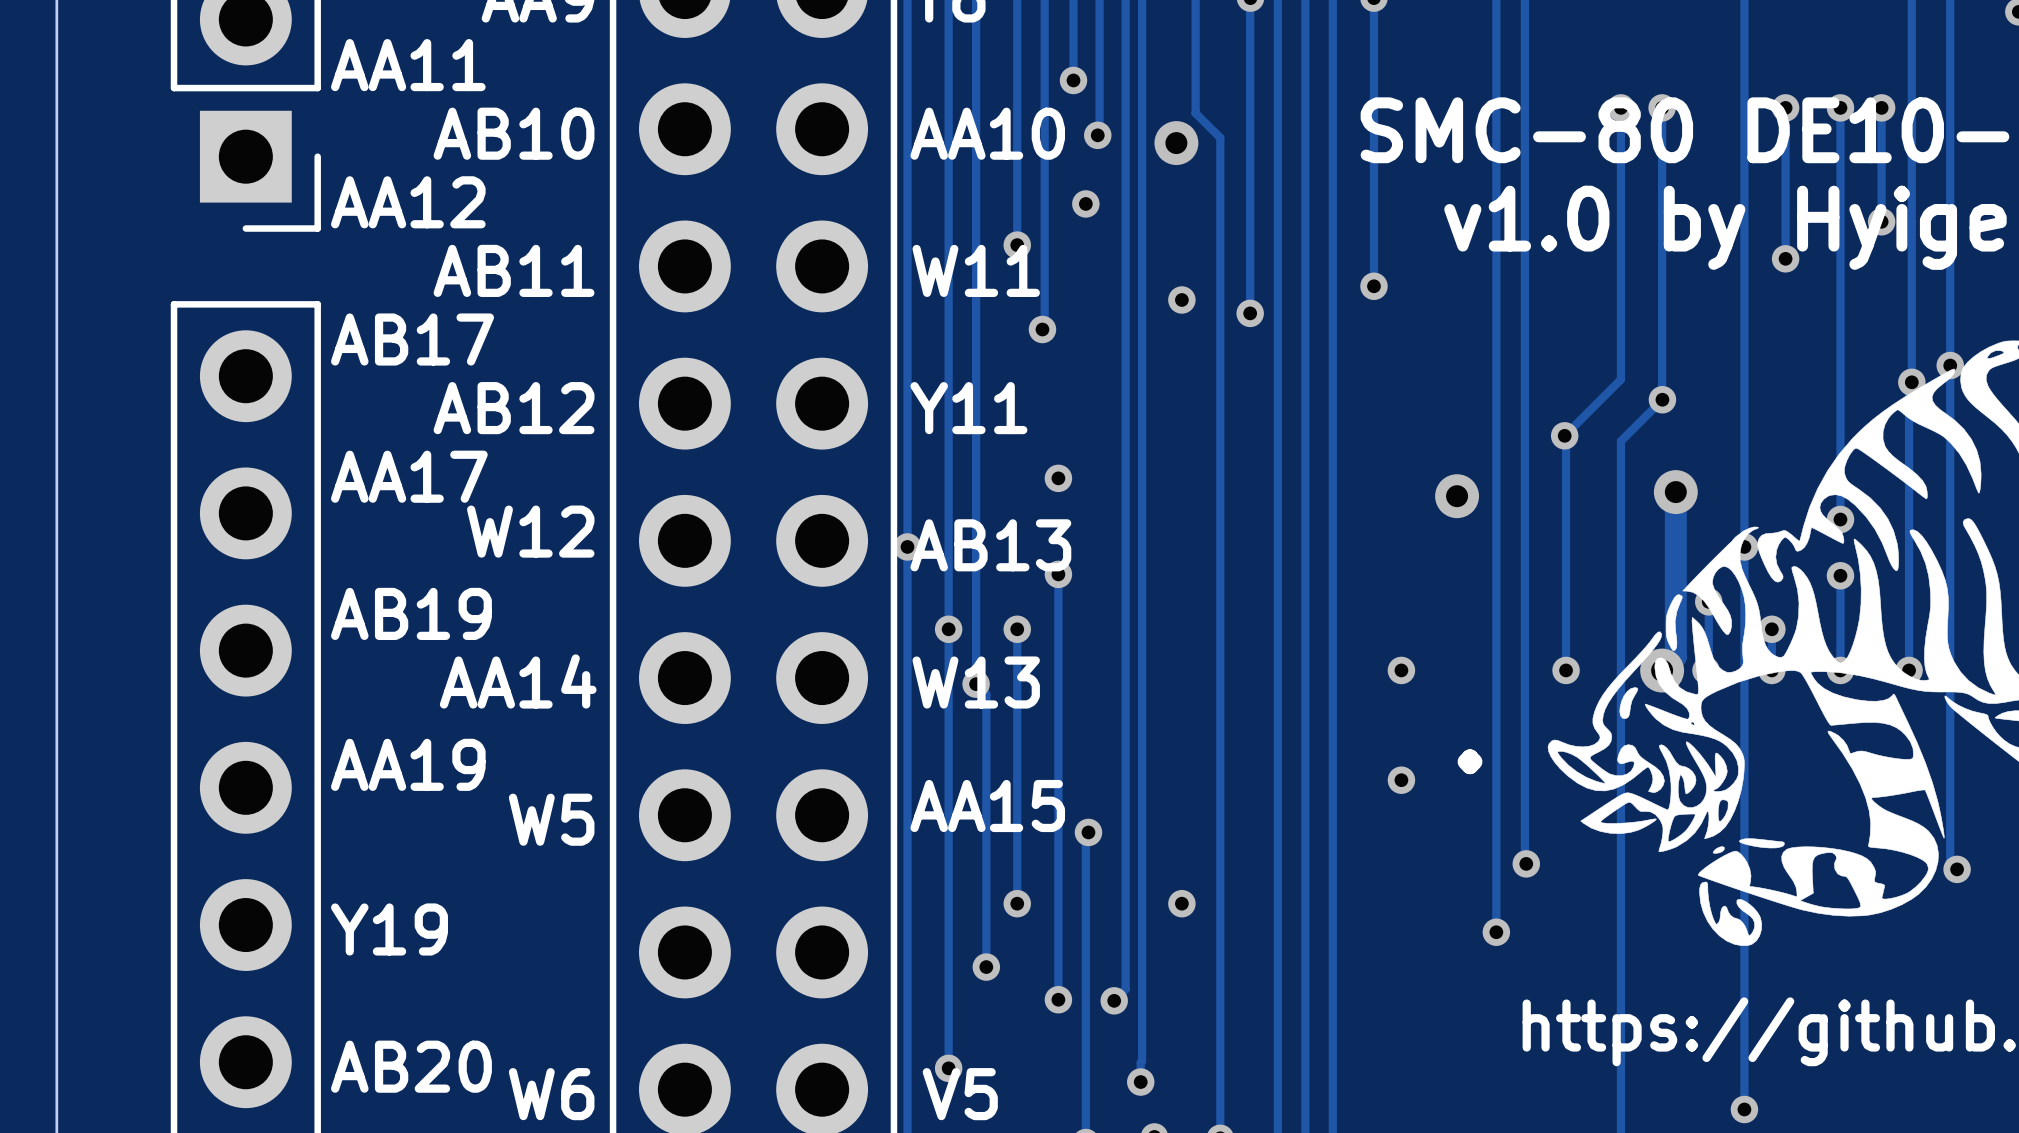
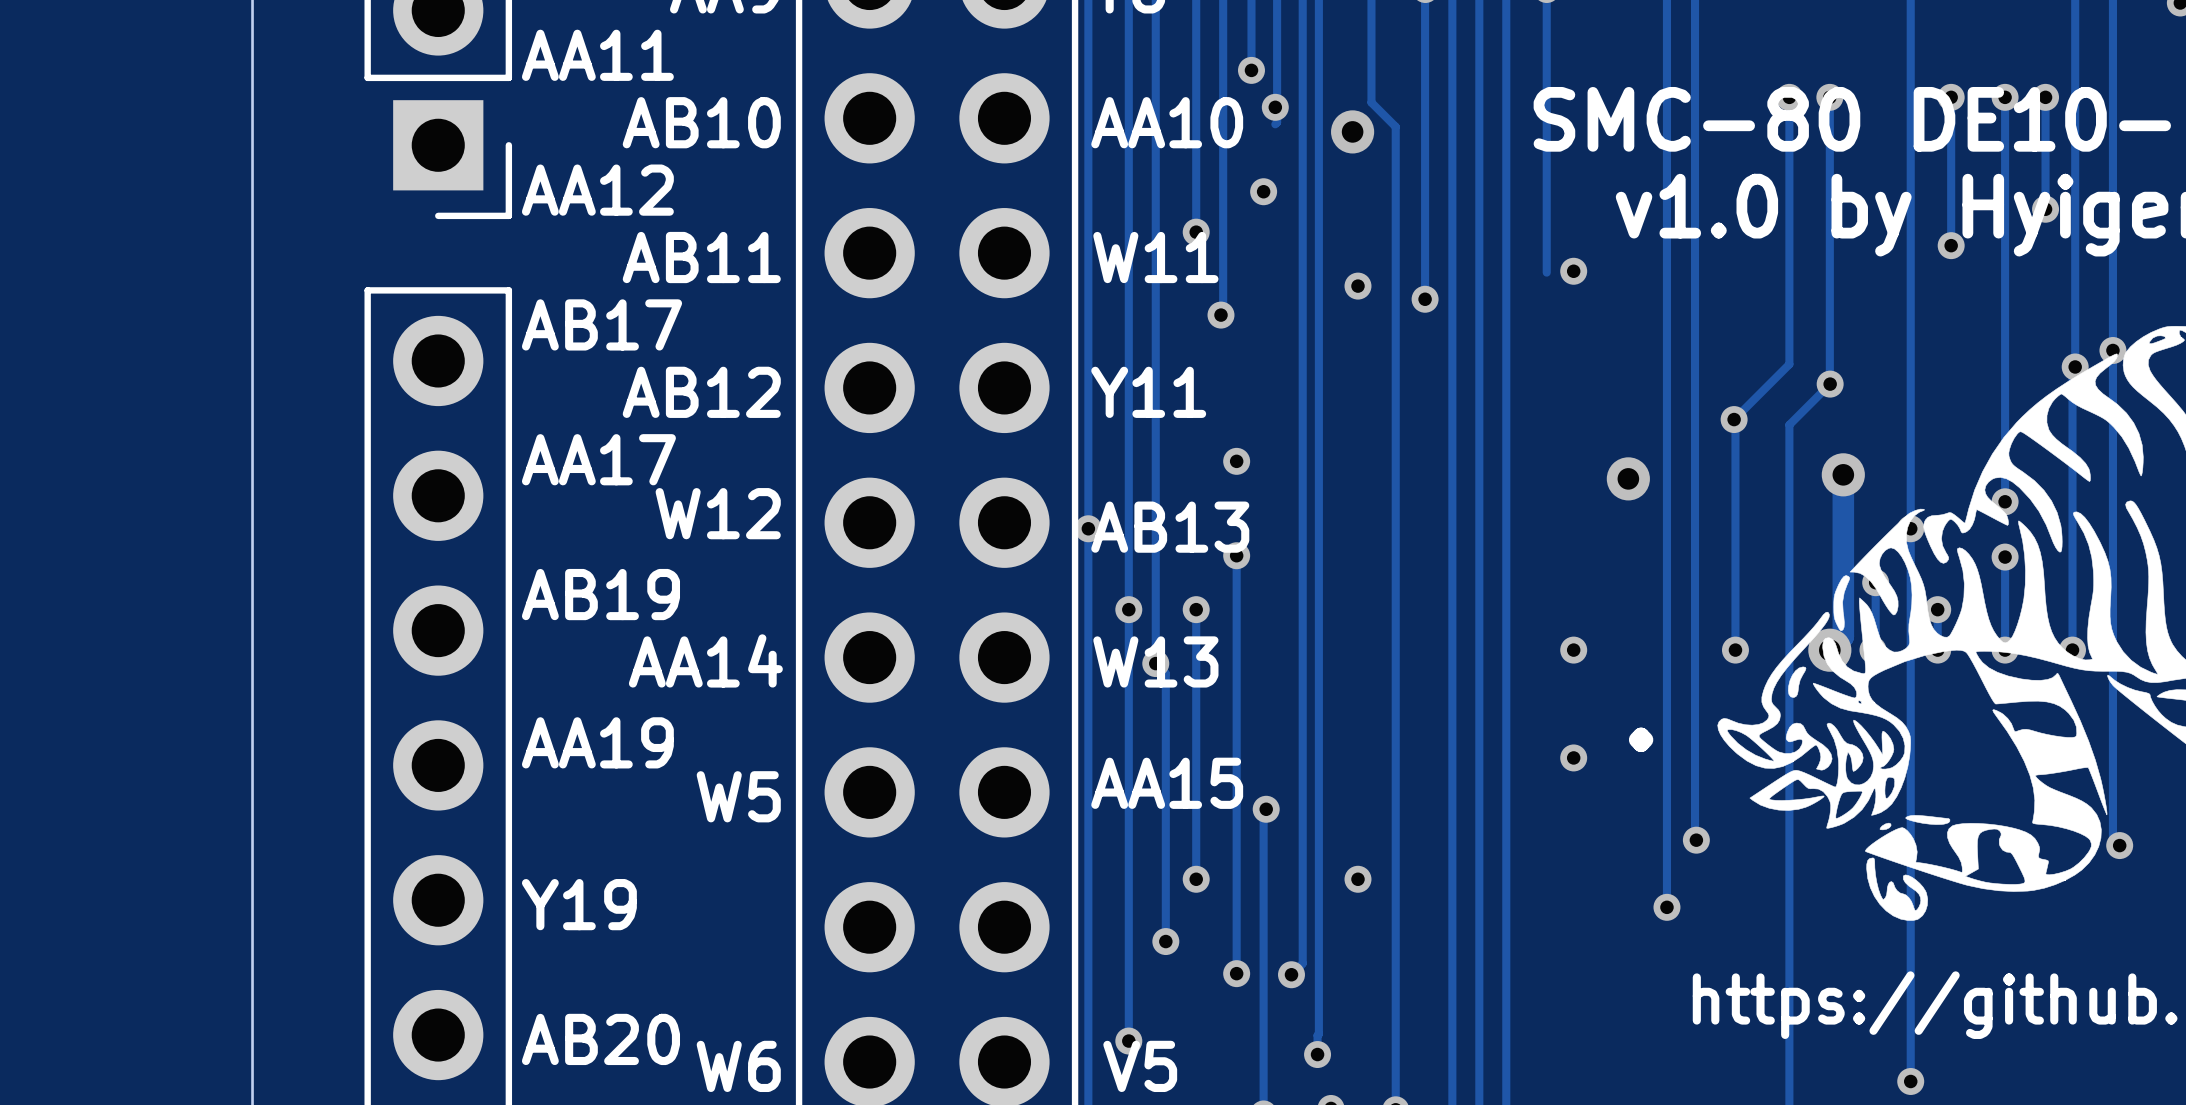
via position: (1097, 135) -> (1275, 107)
via position: (1373, 286) -> (1573, 271)

